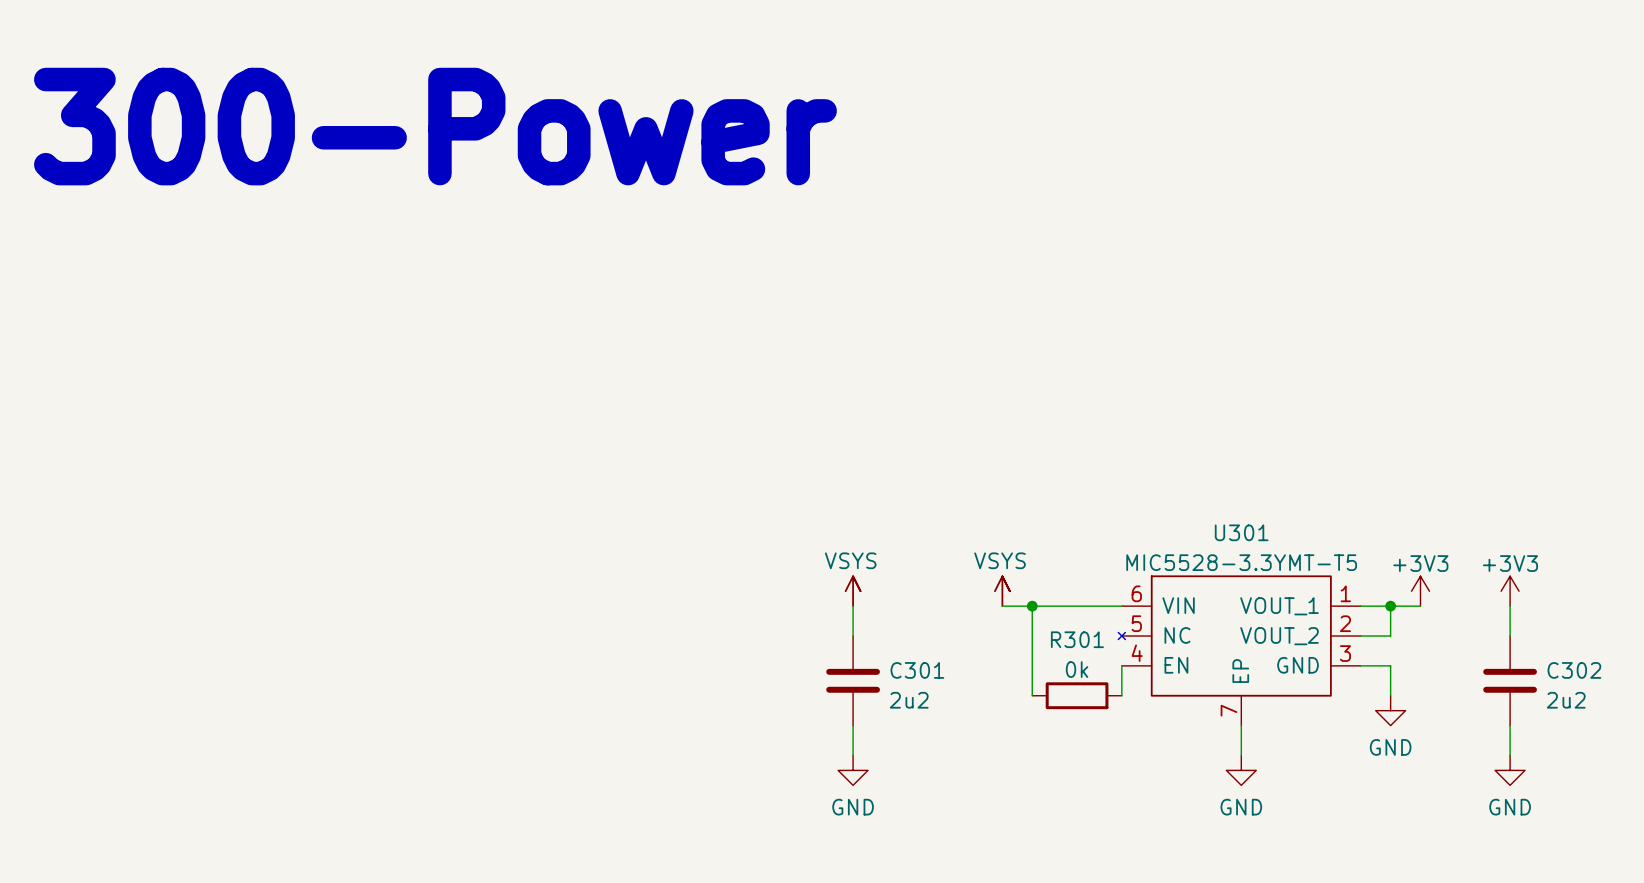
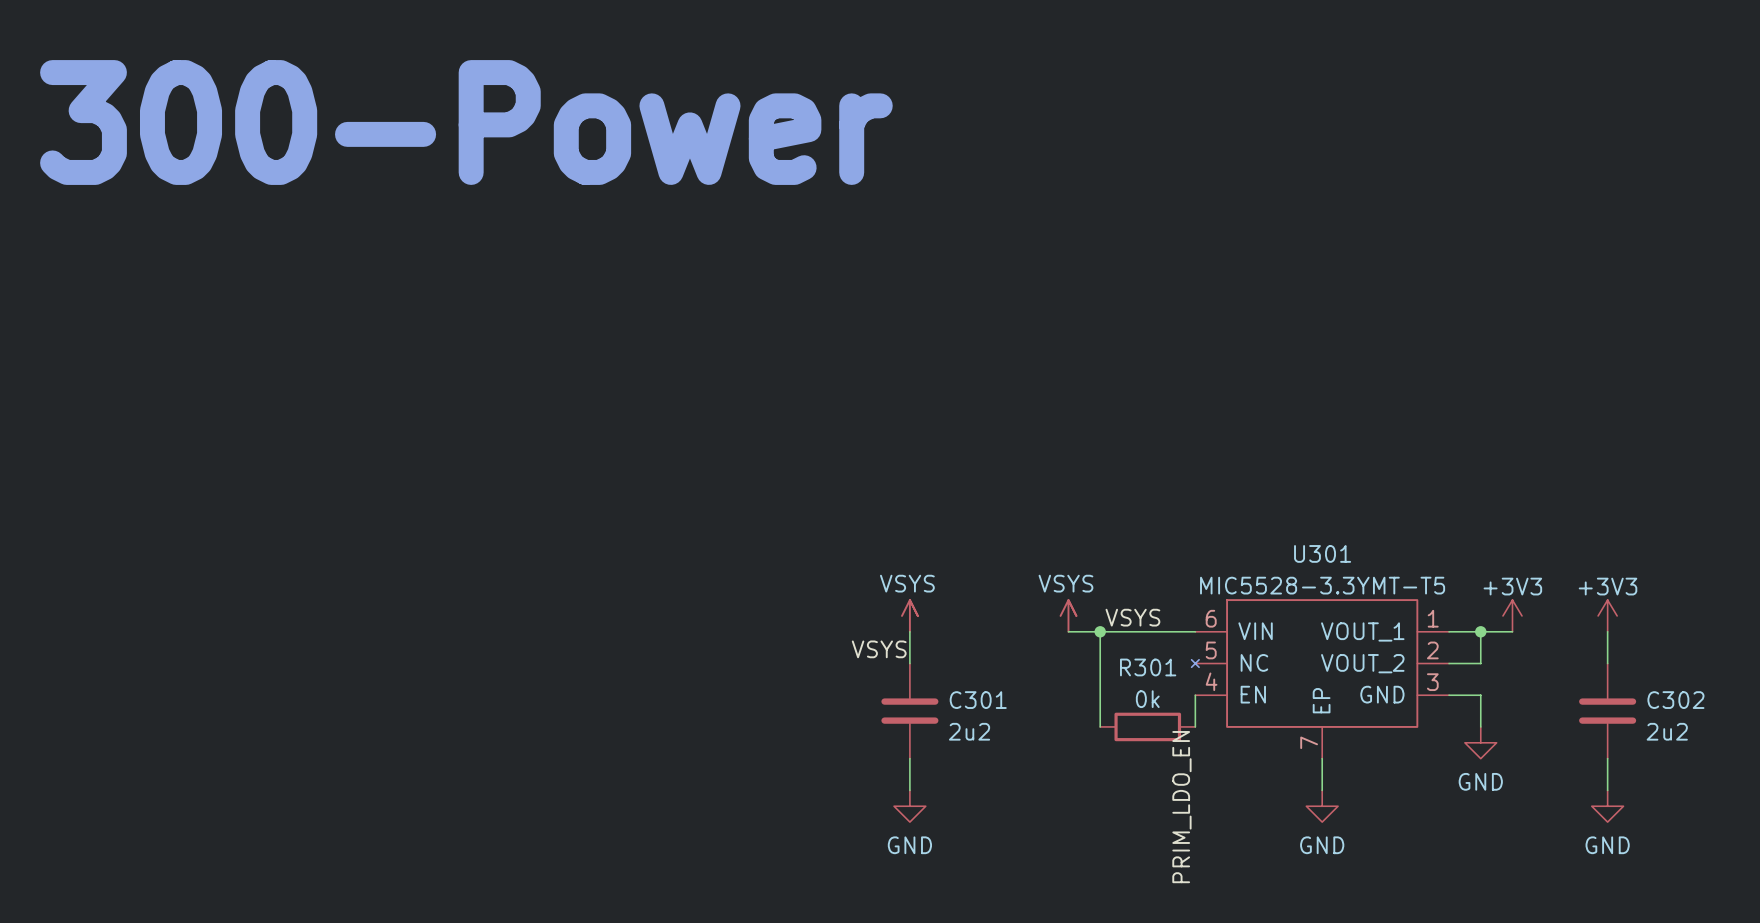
label: none -> VSYS (1132, 617)
label: none -> VSYS (879, 649)
label: none -> PRIM_LDO_EN (1181, 807)

